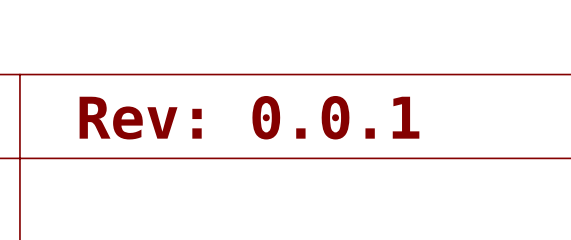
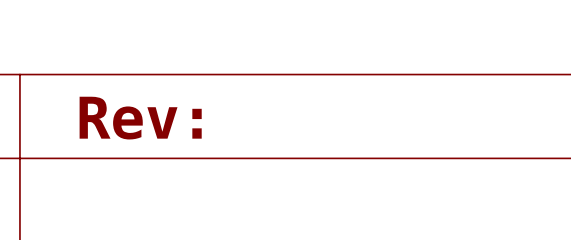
title block: Rev: 0.0.1 (249, 117) -> Rev: (140, 118)

